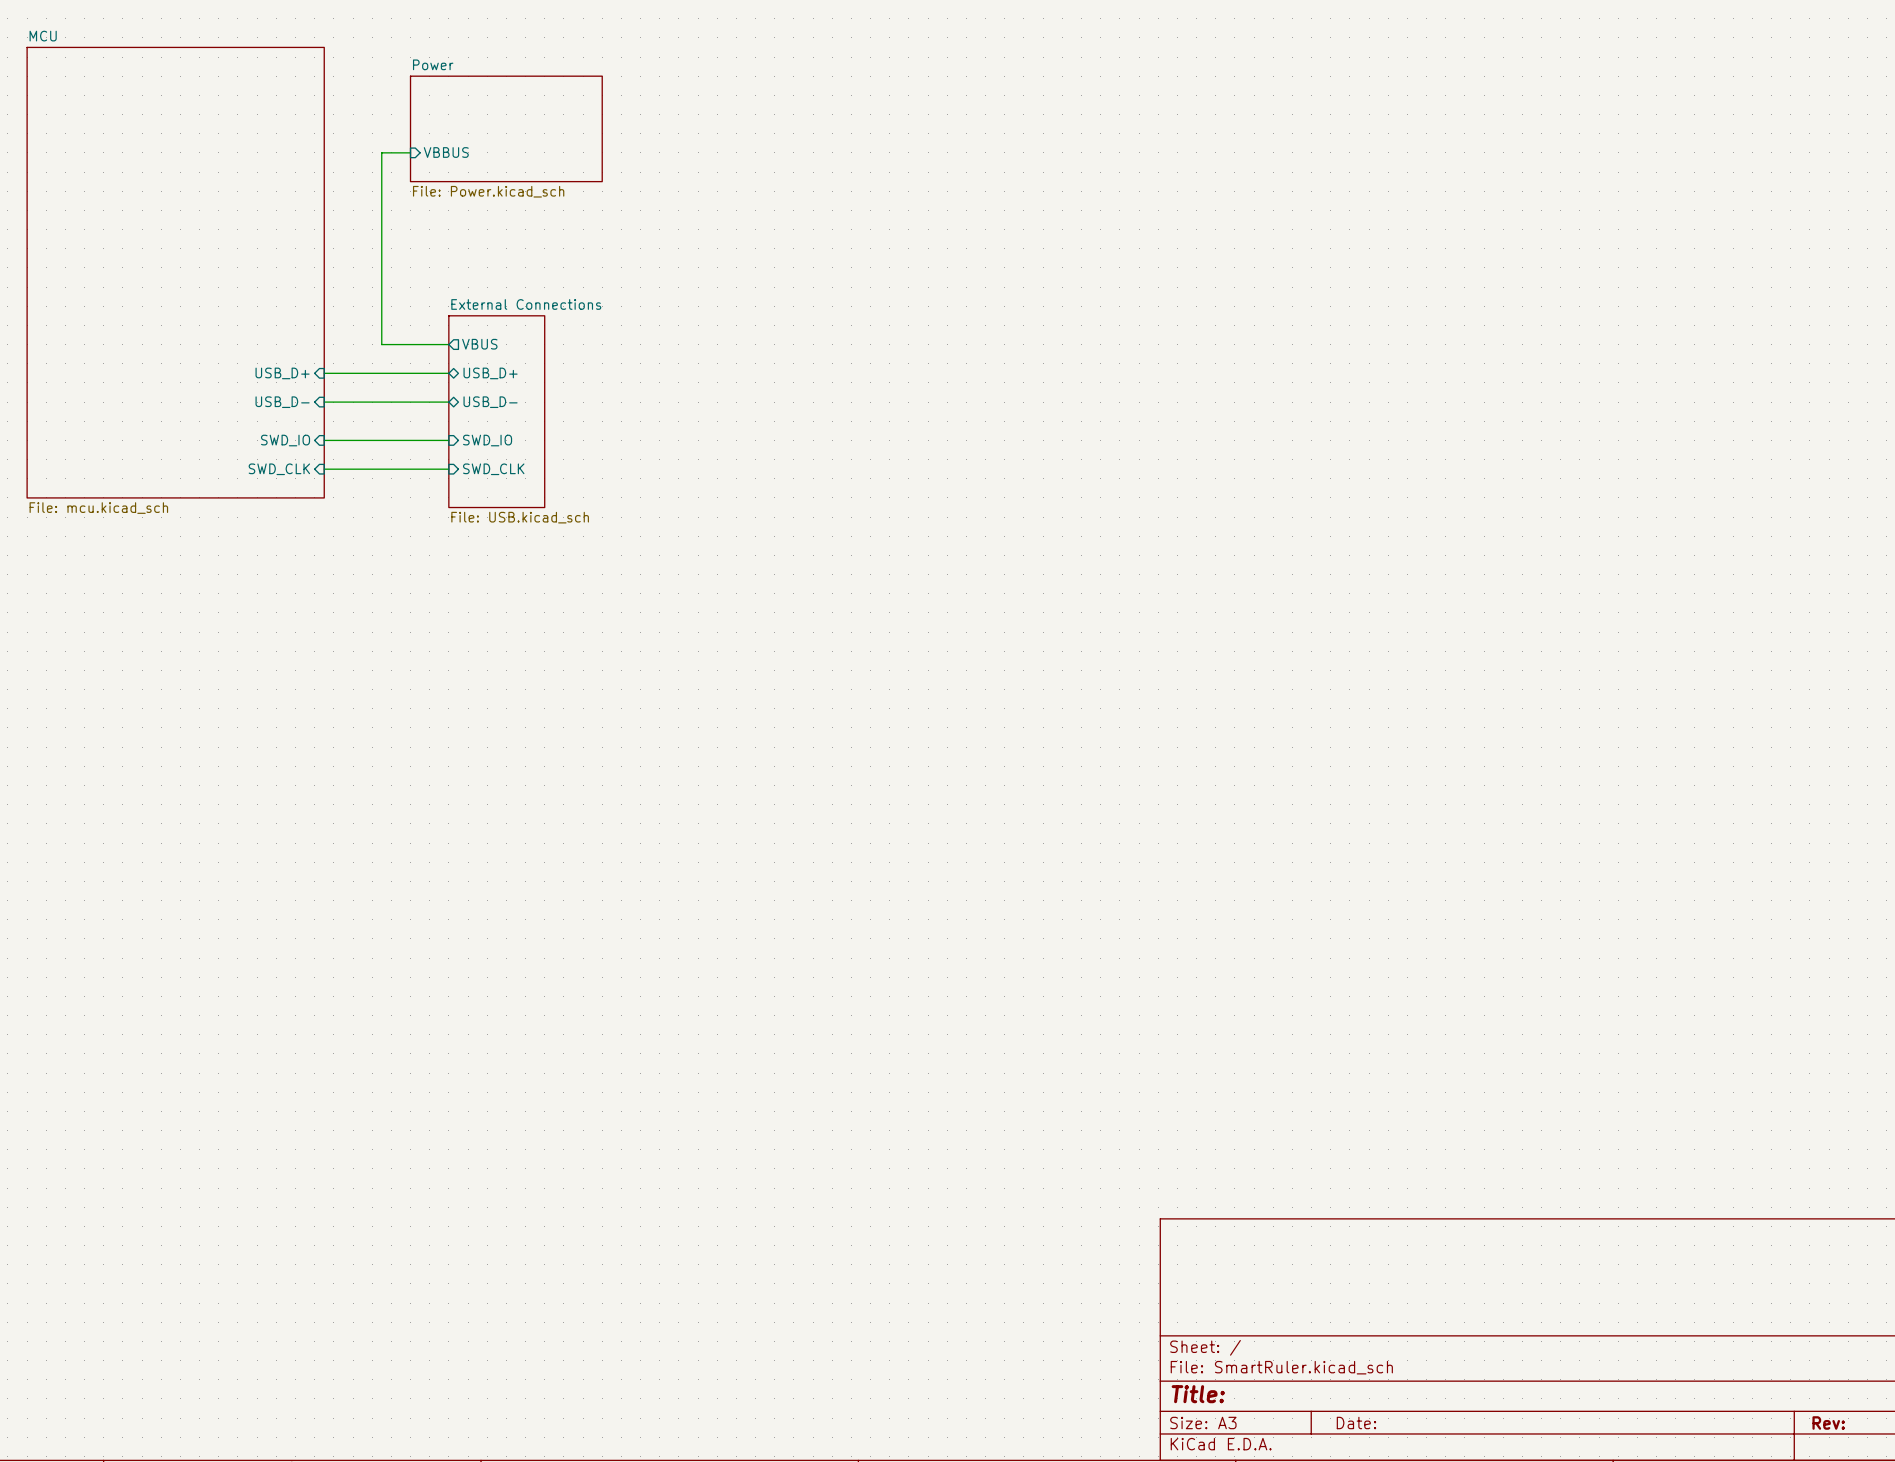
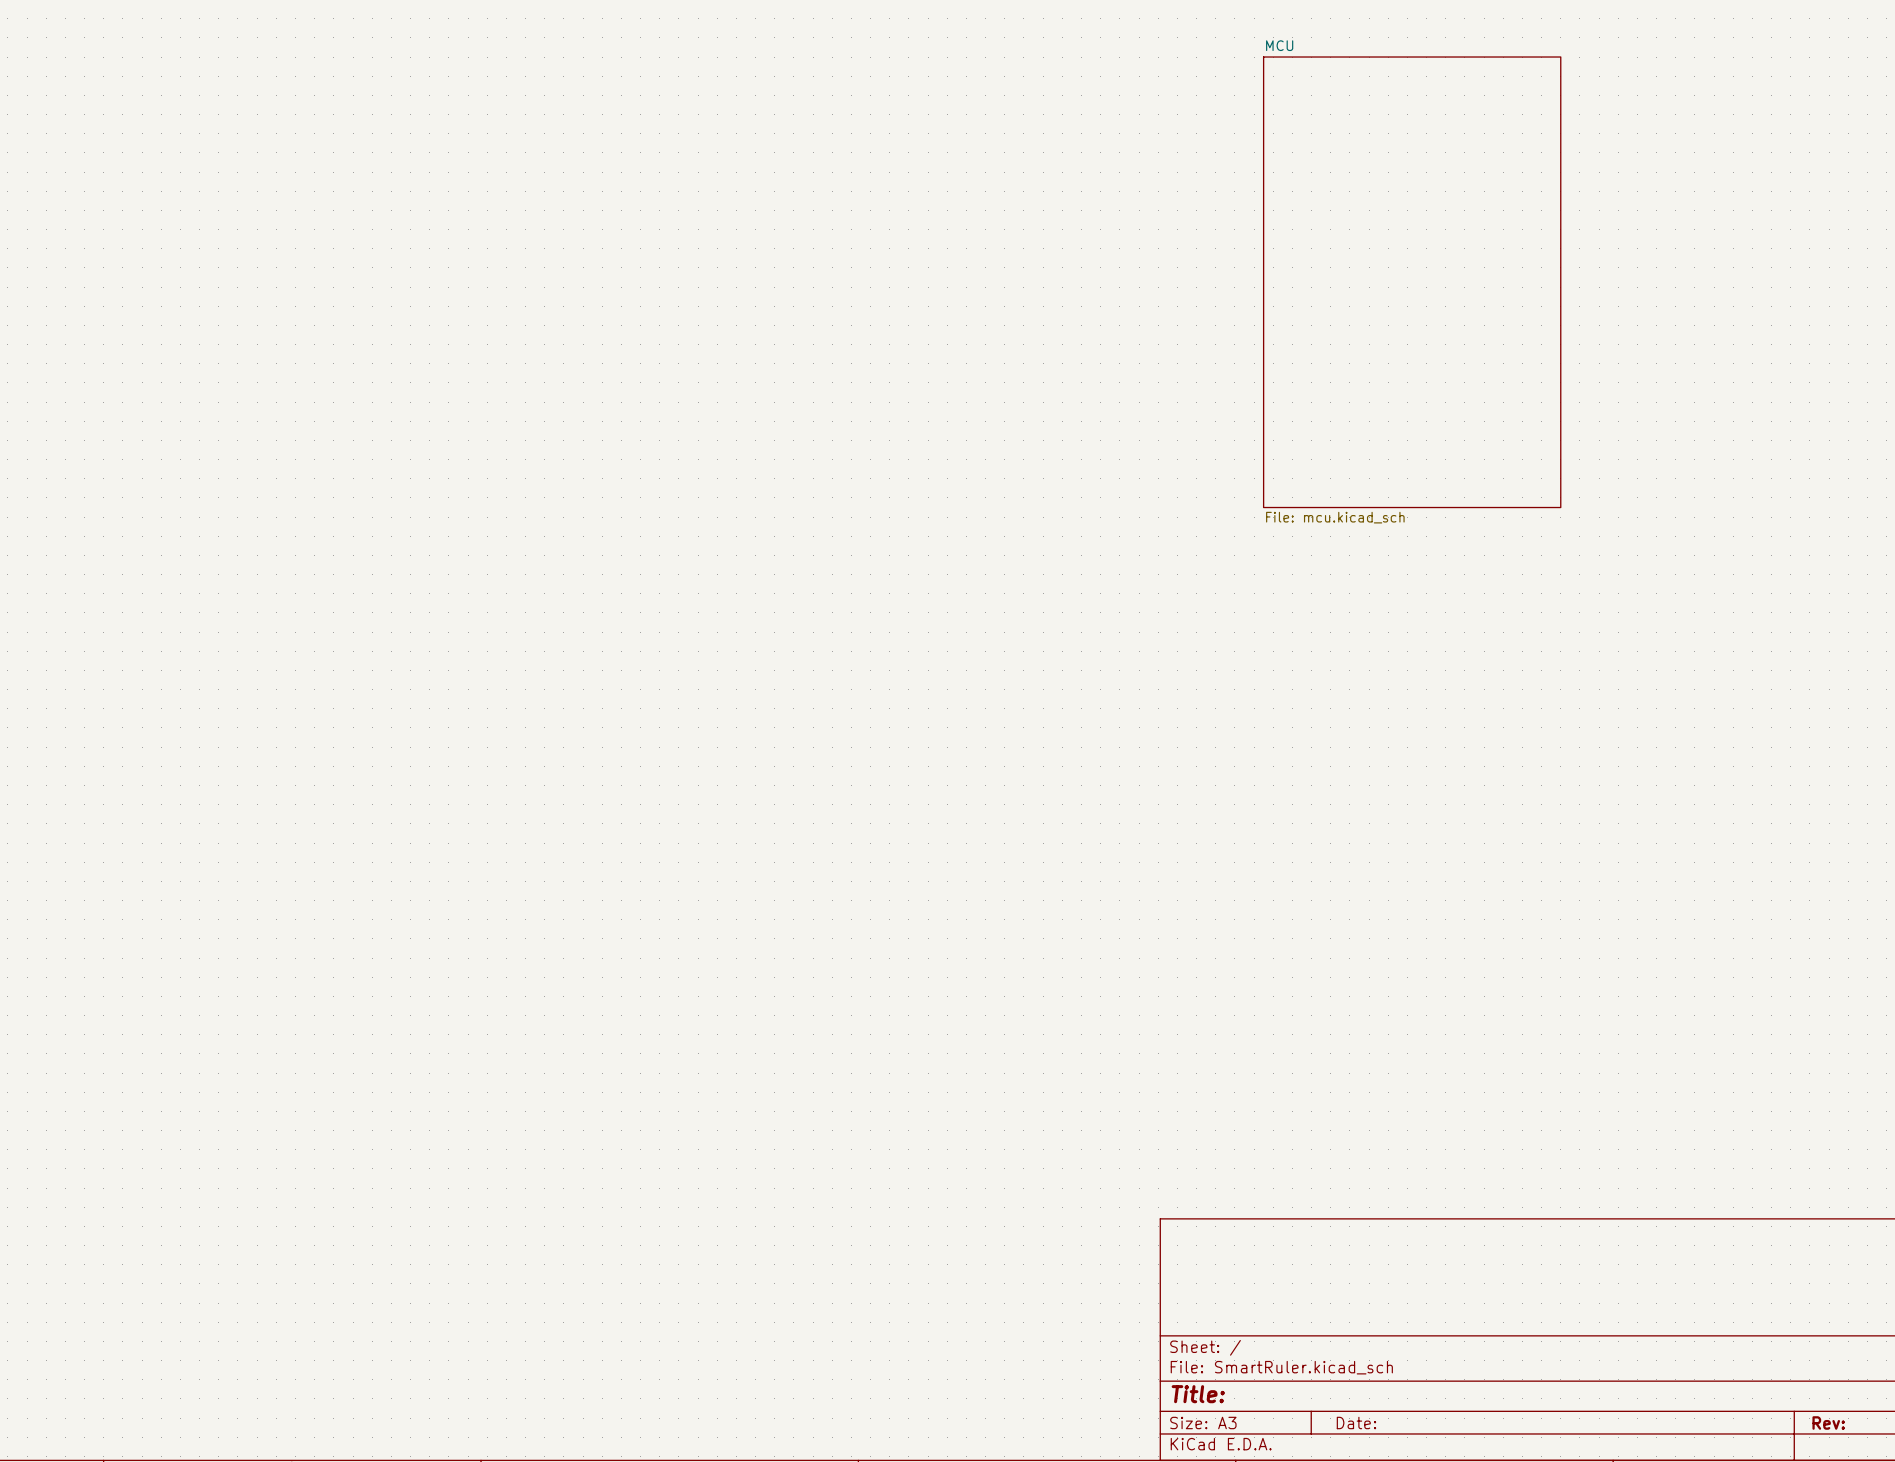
sheet Power: File: Power.kicad_sch (506, 128) -> none
wire: (410, 152) (381, 152) (381, 344) (448, 344) -> none
sheet pin: VBBUS (446, 152) -> none
sheet MCU: File: mcu.kicad_sch (175, 272) -> none
sheet MCU: none -> File: mcu.kicad_sch (1412, 282)
sheet pin: VBUS (479, 344) -> none
sheet pin: USB_D+ (282, 373) -> none
wire: (324, 373) (448, 373) -> none
sheet pin: USB_D+ (490, 373) -> none
sheet pin: USB_D- (282, 402) -> none
wire: (324, 402) (448, 402) -> none
sheet pin: USB_D- (490, 402) -> none
sheet External Connections: File: USB.kicad_sch (496, 411) -> none
sheet pin: SWD_IO (285, 440) -> none
wire: (324, 440) (448, 440) -> none
sheet pin: SWD_IO (487, 440) -> none
sheet pin: SWD_CLK (279, 469) -> none
wire: (324, 469) (448, 469) -> none
sheet pin: SWD_CLK (493, 469) -> none

